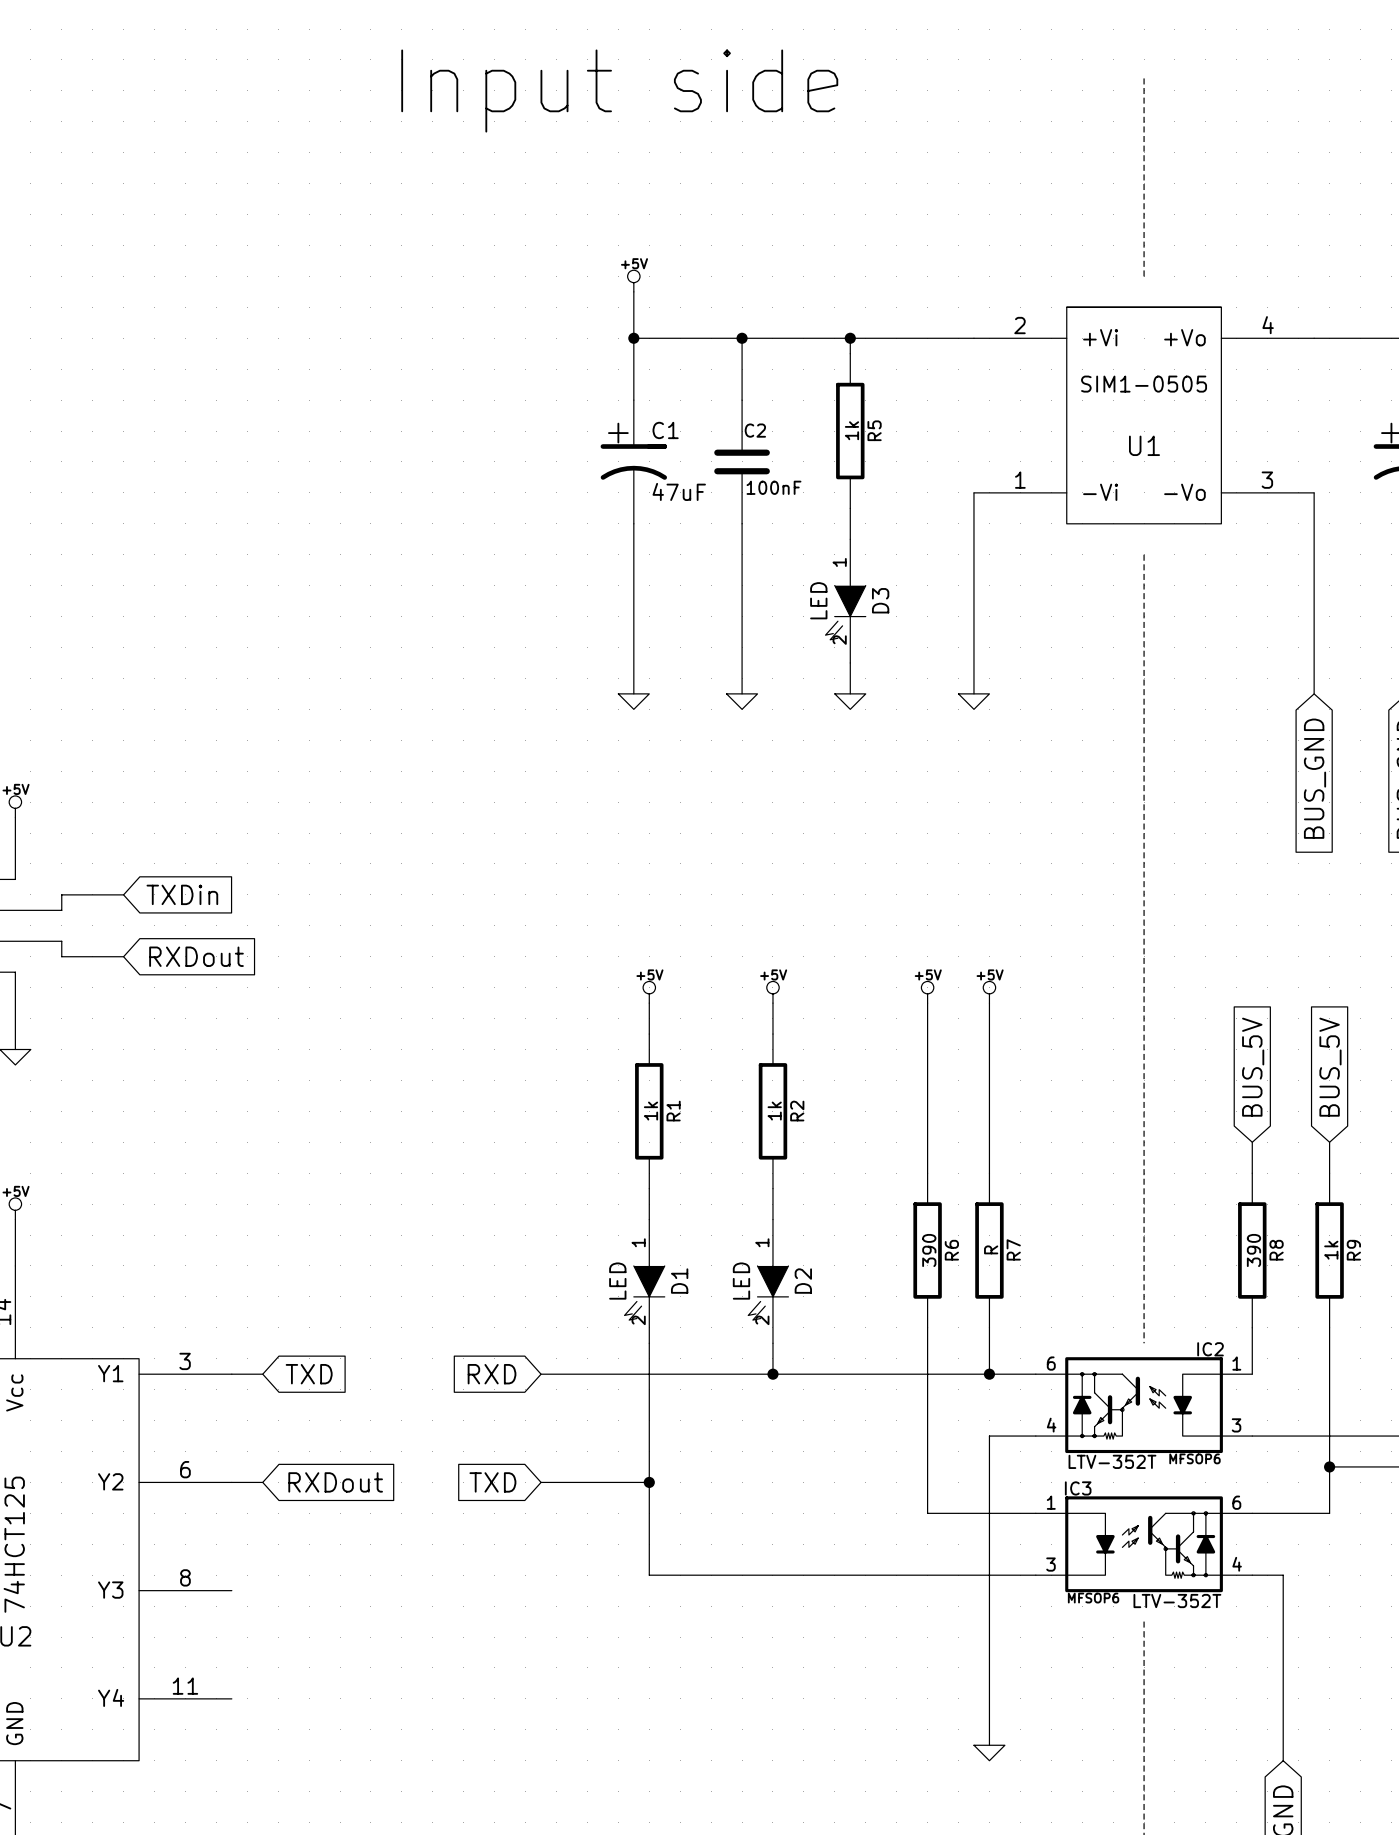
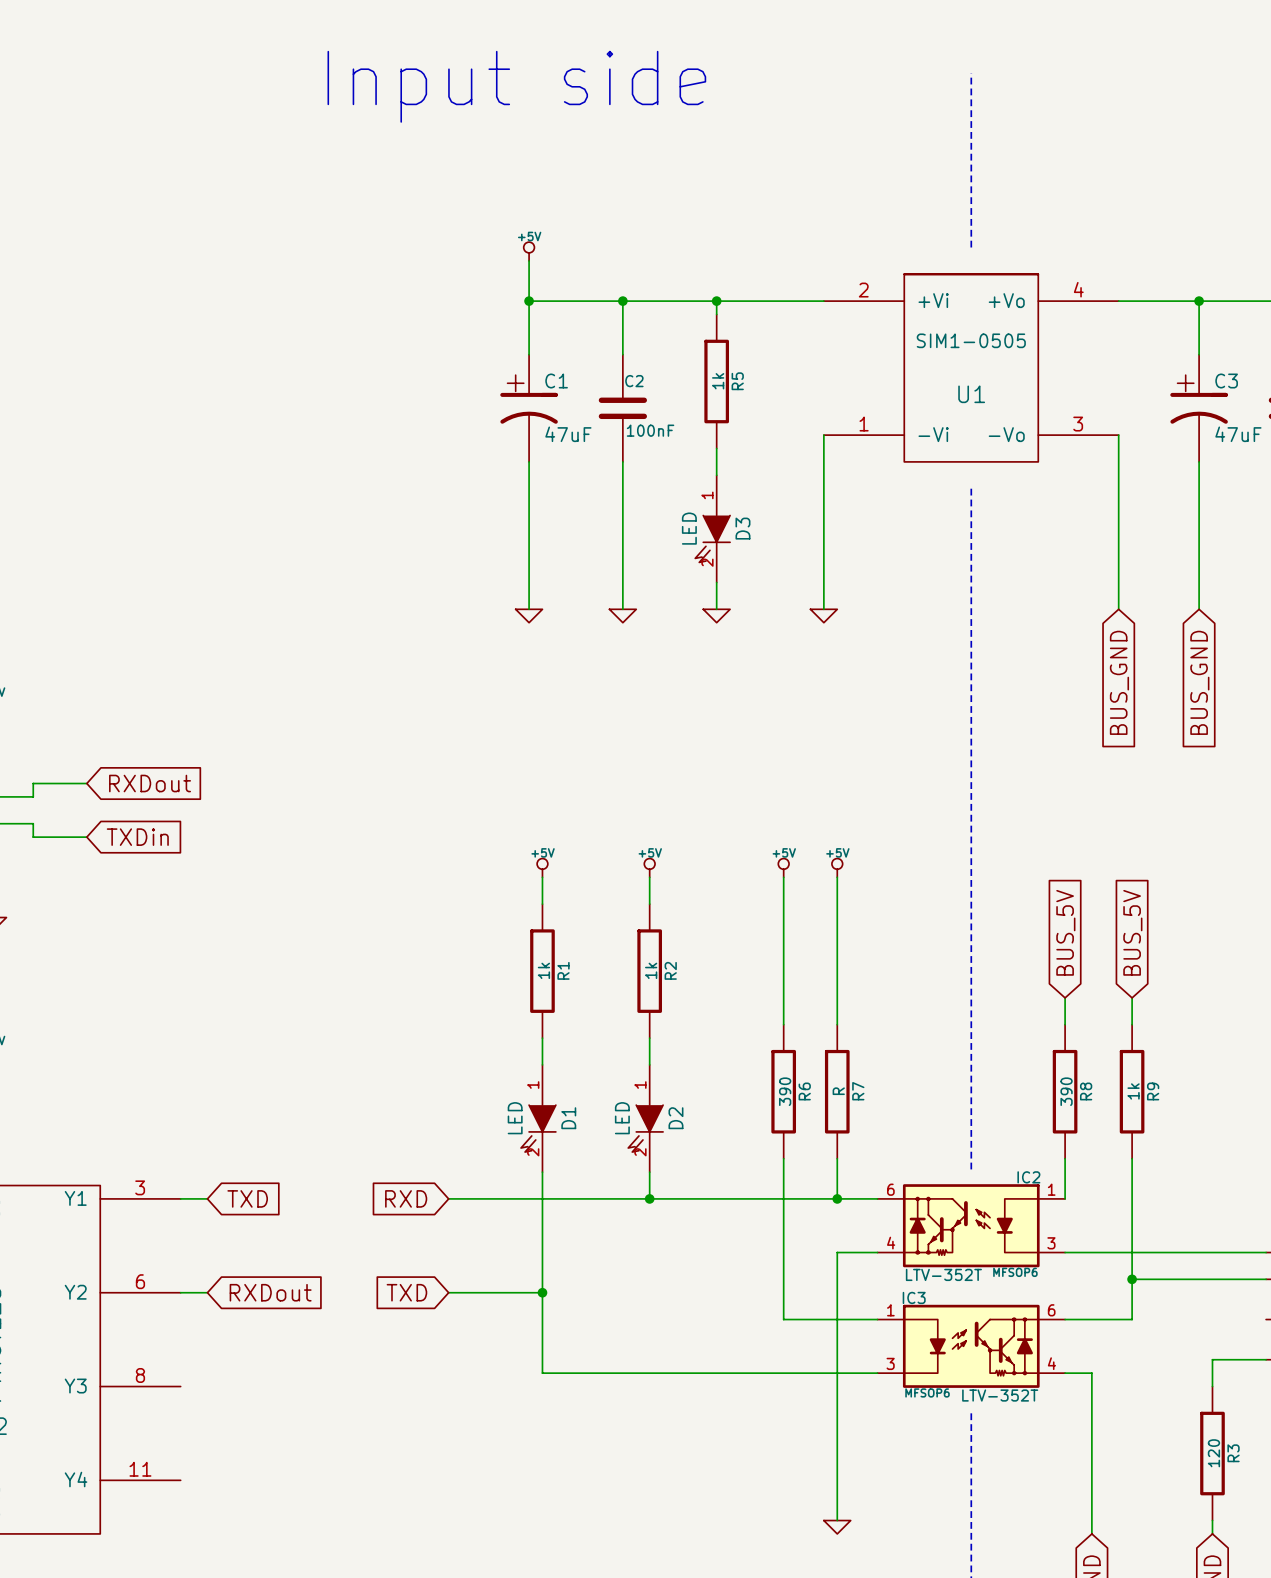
global label: TXDin (182, 894) -> RXDout (150, 783)
global label: RXDout (196, 956) -> TXDin (137, 837)

